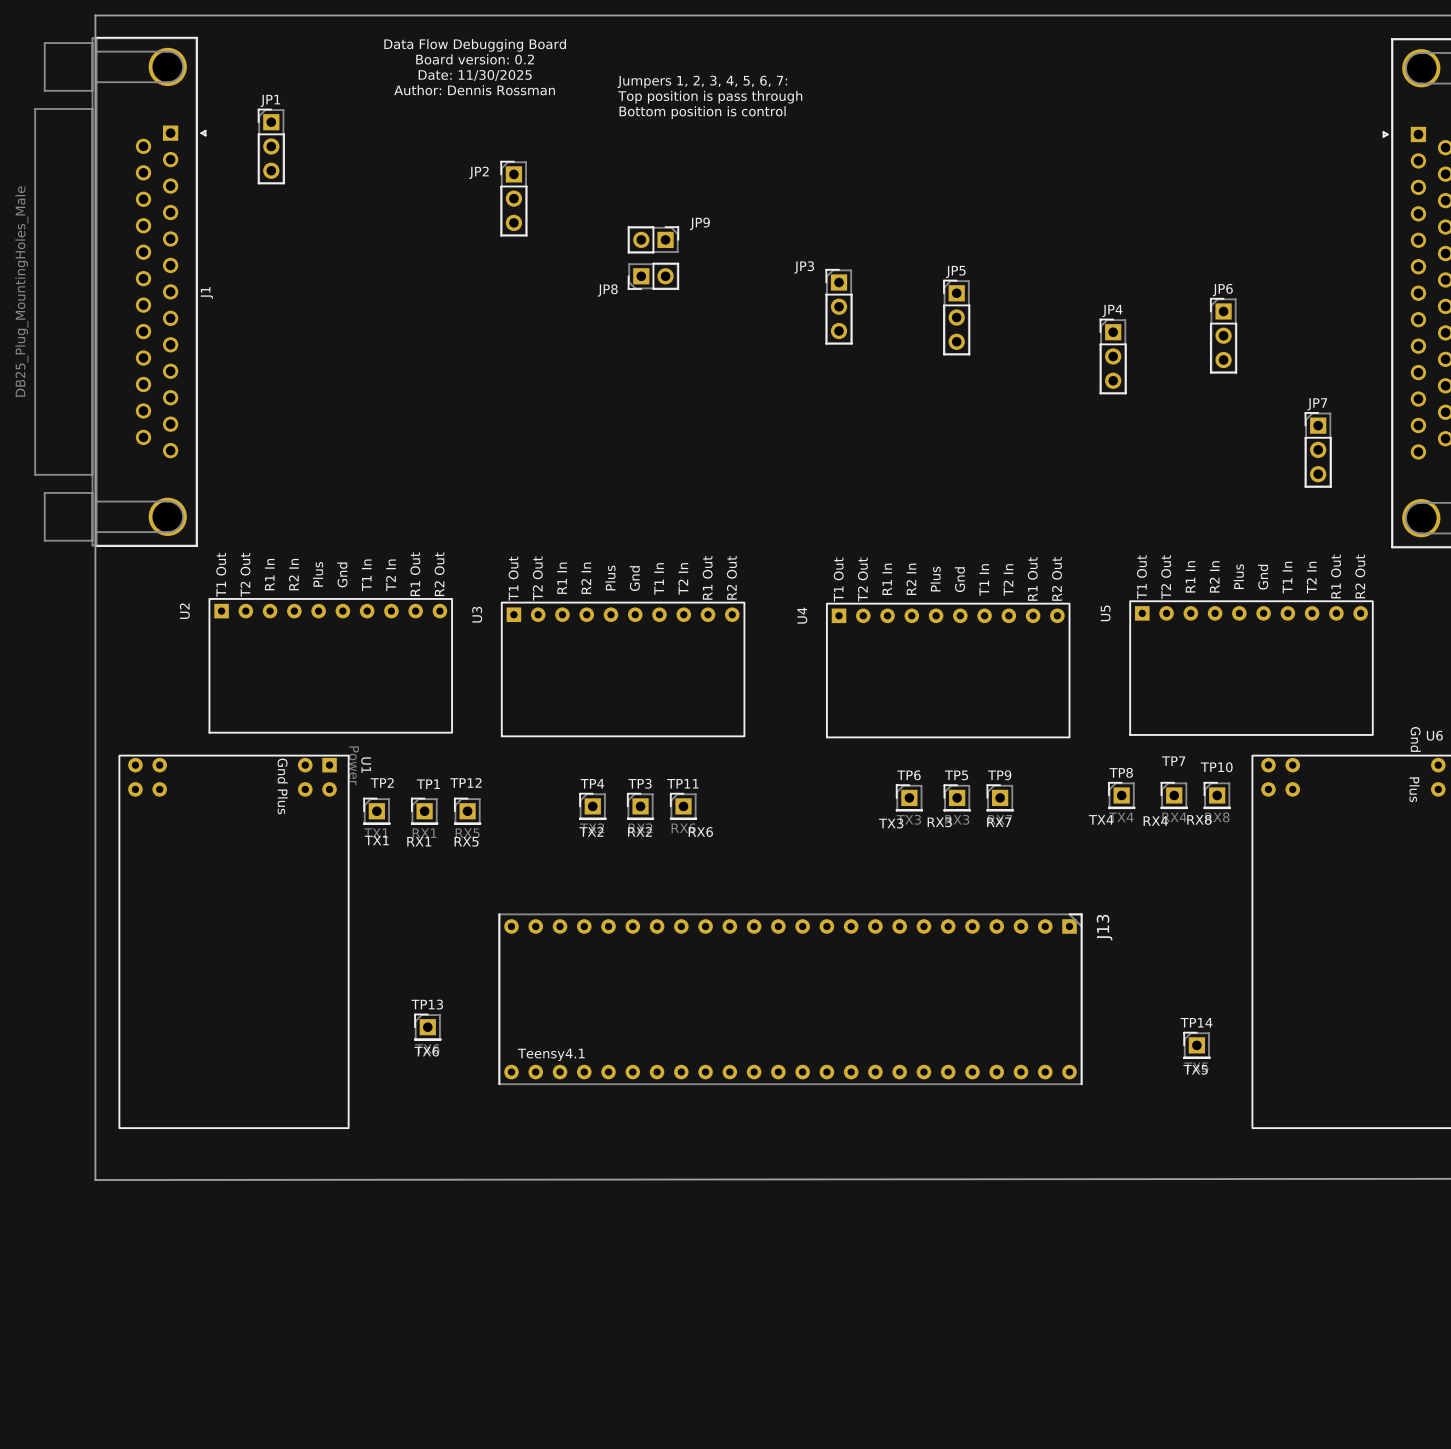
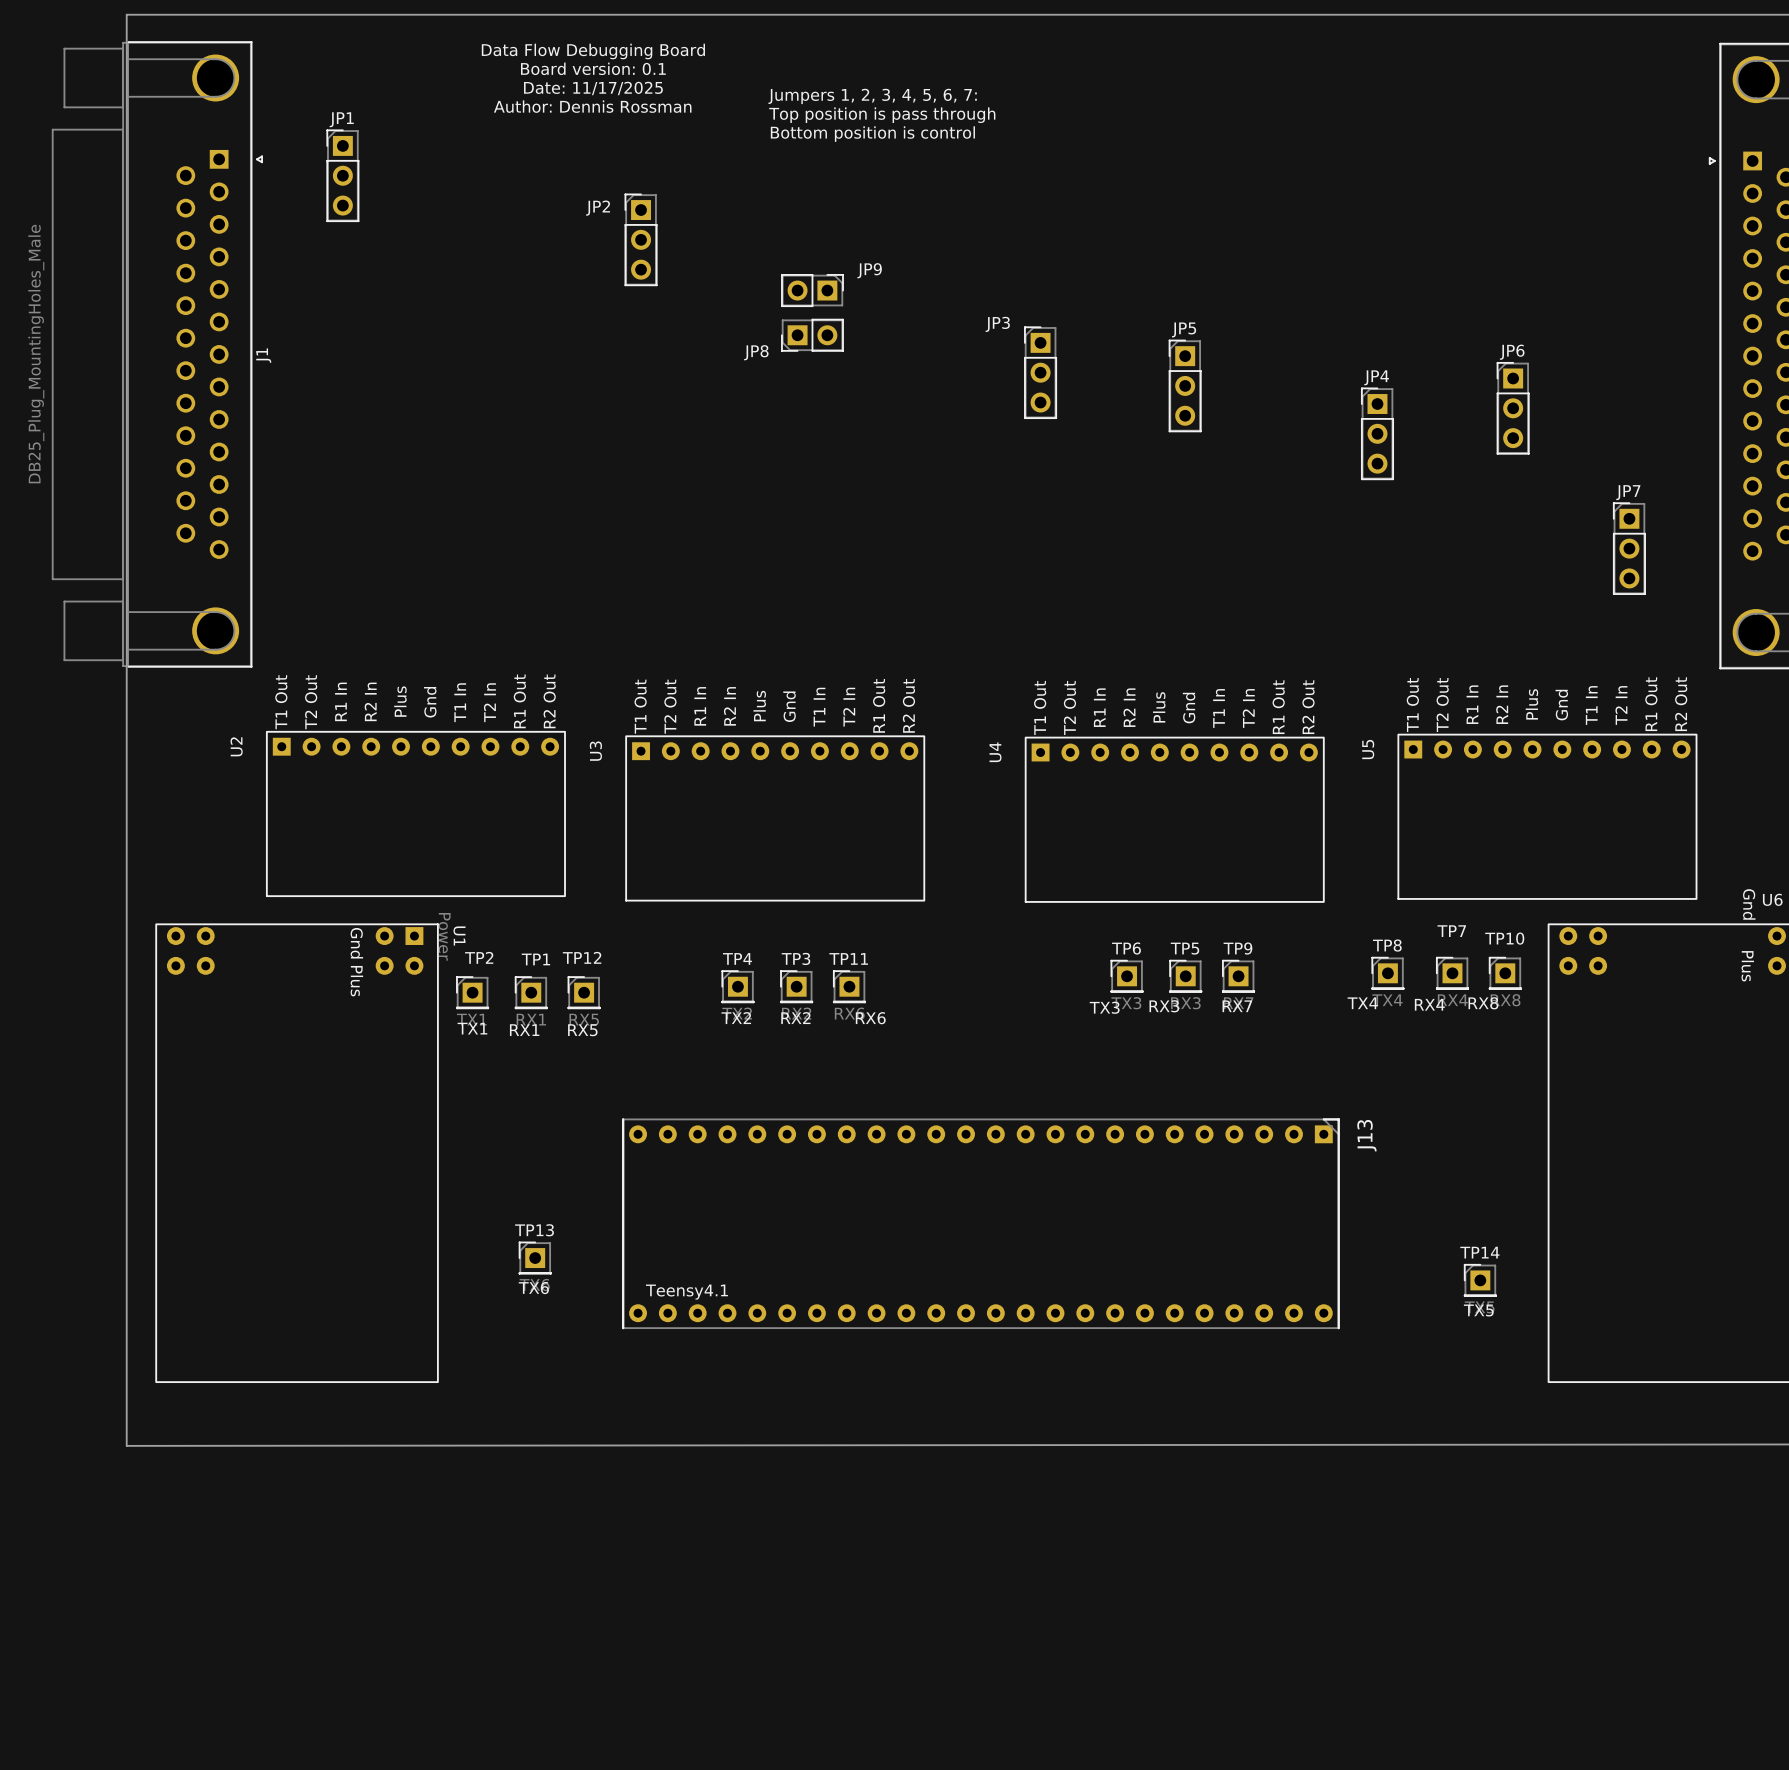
text: Board version: 0.2 (475, 59) -> Board version: 0.1 (593, 68)
text: Date: 11/30/2025 (475, 75) -> Date: 11/17/2025 (593, 88)

